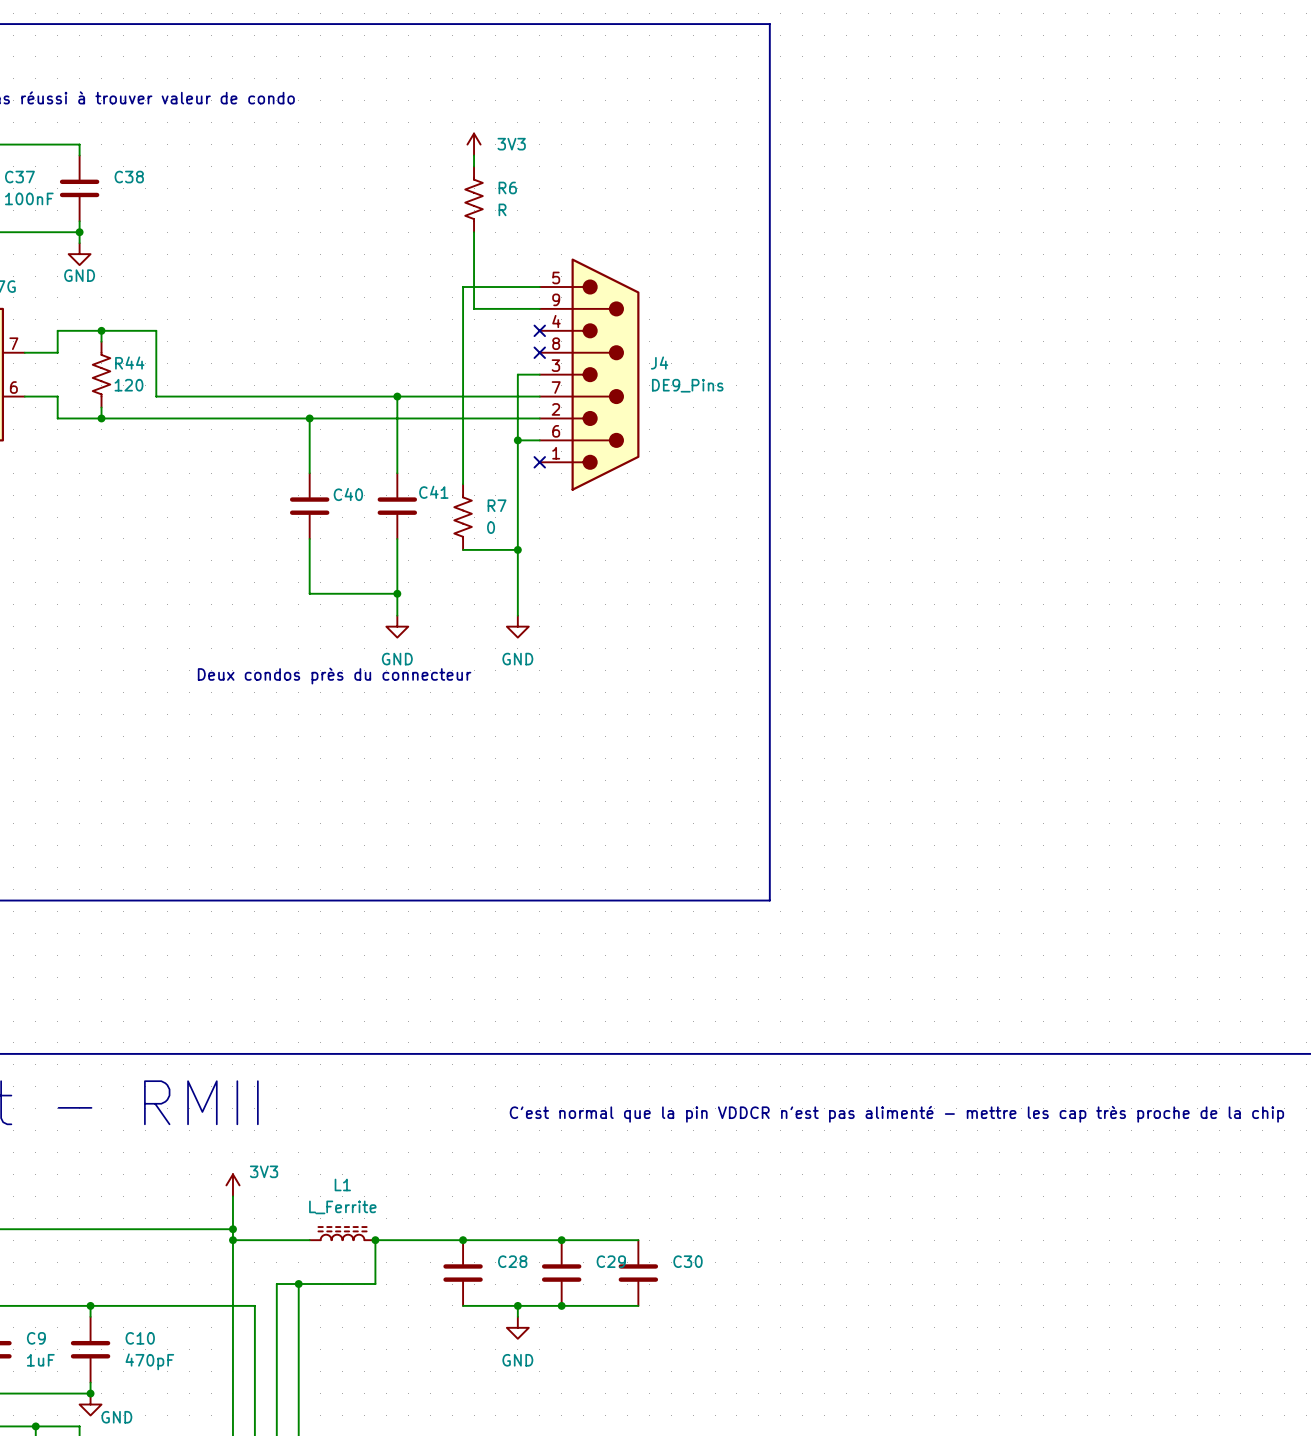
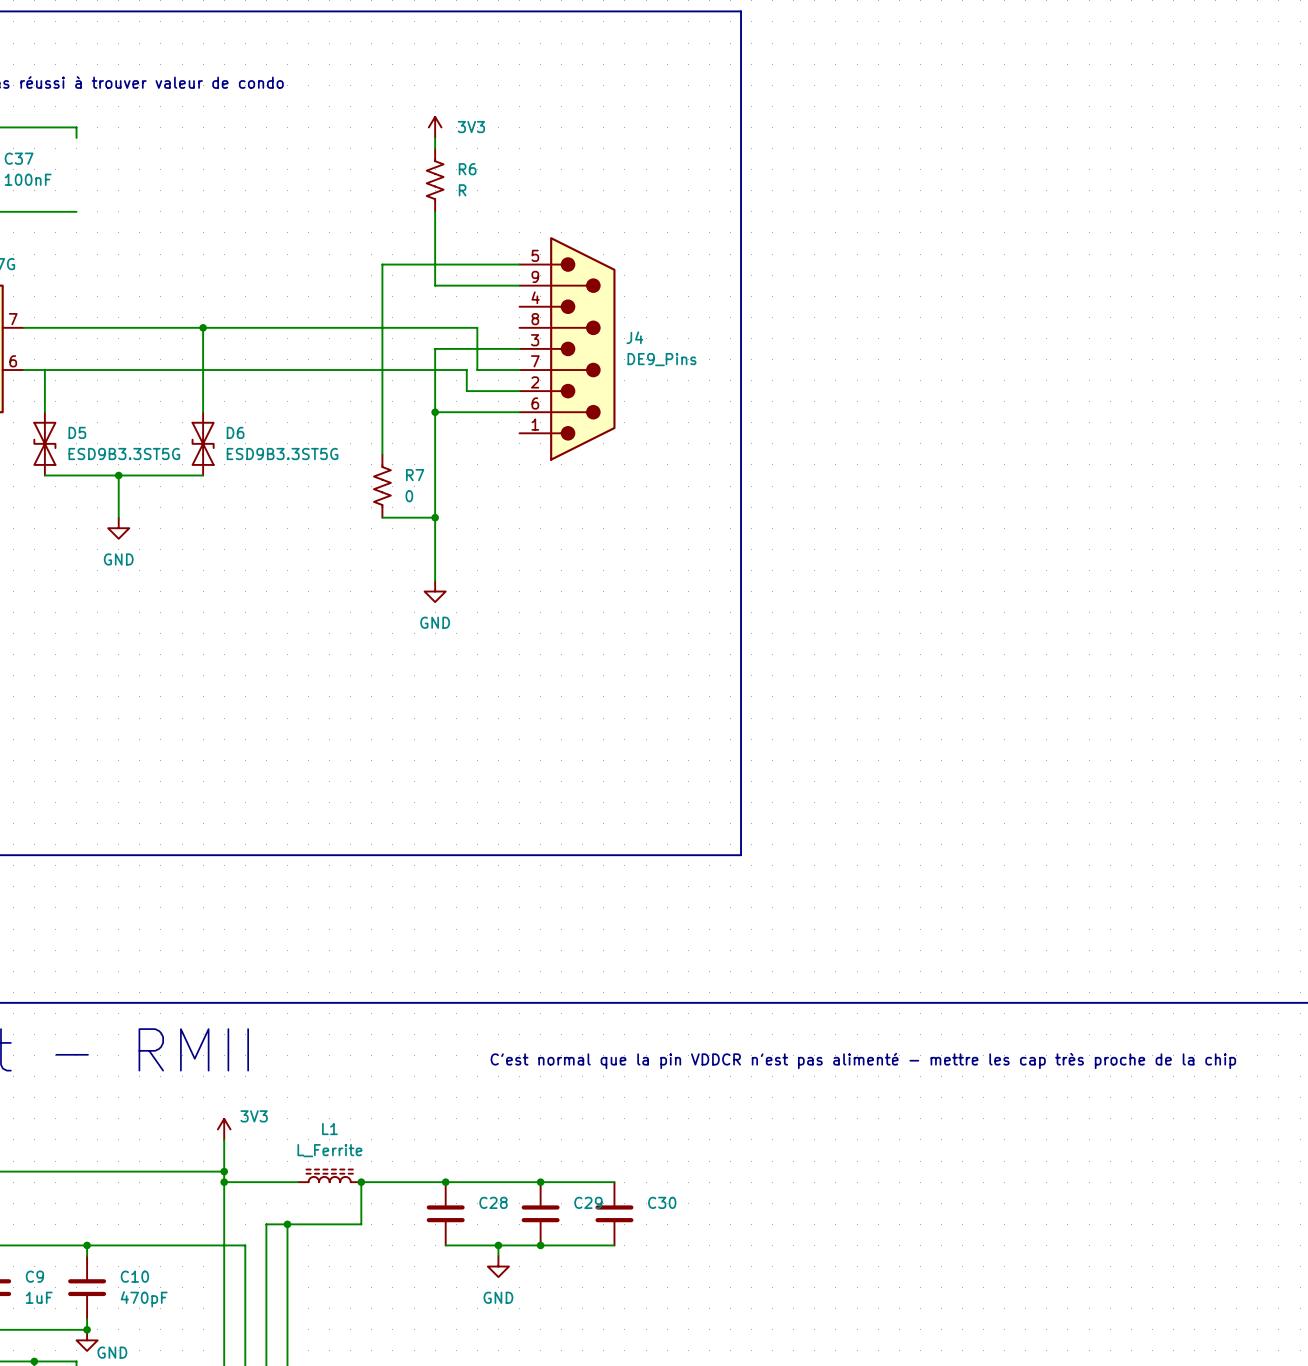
power symbol position: 3V3 (474, 144) -> 3V3 (435, 127)
wire: (474, 155) (474, 166) -> (435, 137) (435, 148)
C38: (79, 188) -> none
R6 position: (474, 199) -> (435, 180)
wire: (79, 221) (79, 243) -> none
junction: (79, 232) -> none
wire: (474, 232) (474, 308) -> (435, 211) (435, 285) (456, 285)
power symbol: GND (79, 254) -> none
wire: (463, 287) (463, 484) -> (445, 264) (382, 264) (382, 370)
wire: (101, 330) (101, 341) -> none
junction: (101, 330) -> none
no-connect mark: (539, 330) -> none
wire: (57, 352) (57, 330) (156, 330) (156, 396) -> (55, 370) (150, 370)
wire: none -> (55, 327) (477, 327) (477, 370)
wire: none -> (203, 327) (203, 412)
junction: none -> (203, 327)
no-connect mark: (539, 352) -> none
R44: 120 (101, 374) -> none
wire: (517, 374) (517, 615) -> (498, 348) (435, 348) (435, 580)
wire: none -> (44, 370) (44, 412)
wire: (57, 396) (57, 418) (484, 418) -> none
junction: (397, 396) -> none
wire: (484, 396) (495, 396) -> (466, 370) (466, 391)
wire: (101, 407) (101, 418) -> none
junction: (101, 418) -> none
wire: (309, 418) (309, 473) -> none
junction: (309, 418) -> none
wire: none -> (435, 412) (498, 412)
junction: none -> (435, 412)
junction: (517, 440) -> none
no-connect mark: (539, 462) -> none
D5: none -> ESD9B3.3ST5G (44, 443)
D6: none -> ESD9B3.3ST5G (203, 443)
wire: none -> (44, 475) (203, 475)
wire: none -> (118, 475) (118, 517)
junction: none -> (118, 475)
C40: (309, 506) -> none
C41: (397, 506) -> none
R7 position: (463, 517) -> (382, 486)
wire: (309, 538) (309, 593) (397, 593) -> none
wire: (397, 538) (397, 615) -> none
junction: none -> (435, 517)
wire: (463, 549) (517, 549) -> (382, 517) (435, 517)
junction: (517, 549) -> none
power symbol: none -> GND (118, 528)
junction: (397, 593) -> none
power symbol: GND (397, 626) -> none
power symbol: none -> GND (435, 591)
power symbol: GND (517, 626) -> none
text: Deux condos près du connecteur (334, 676) -> none

